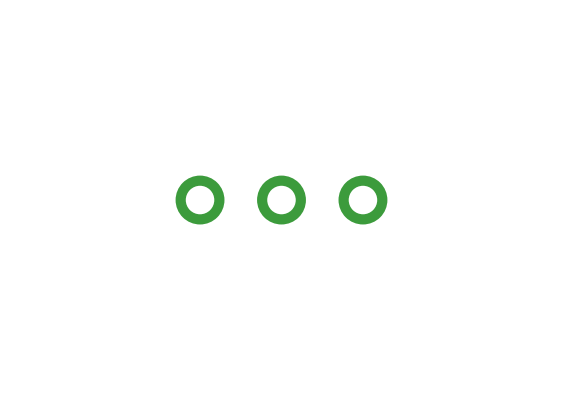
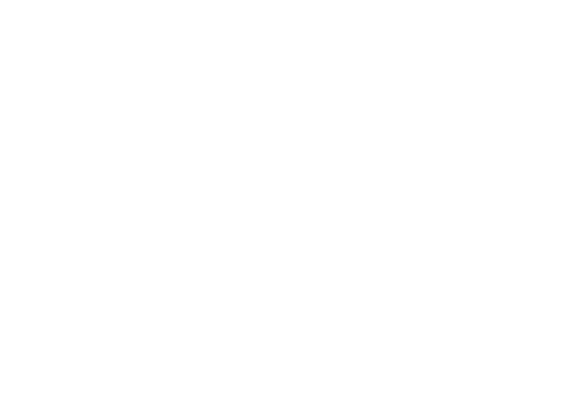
part: (281, 200) -> none

